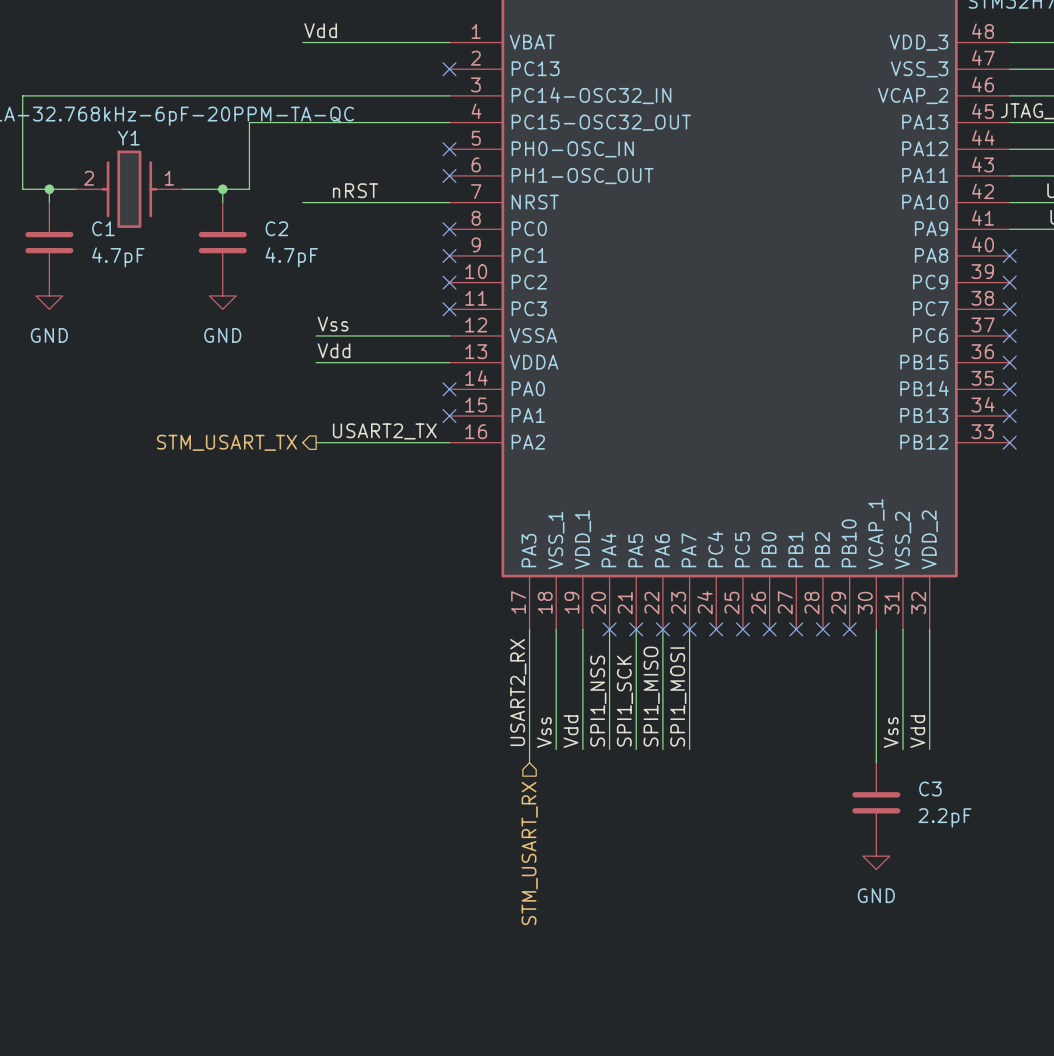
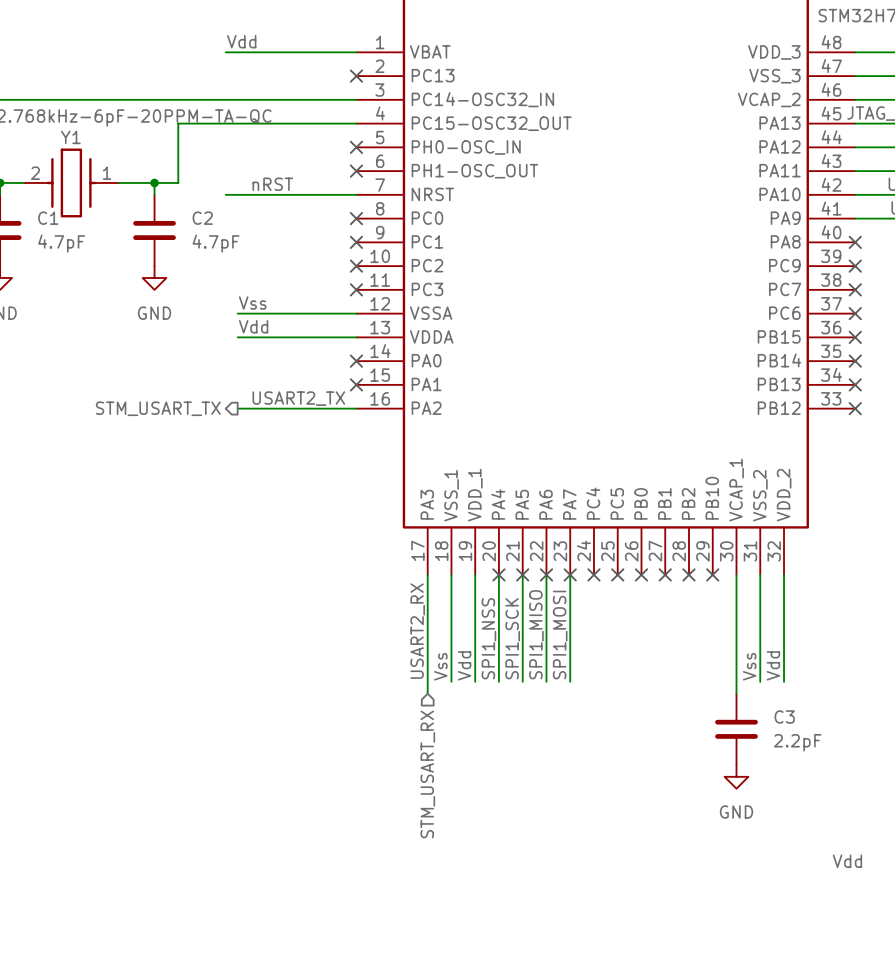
label: none -> Vdd (847, 861)

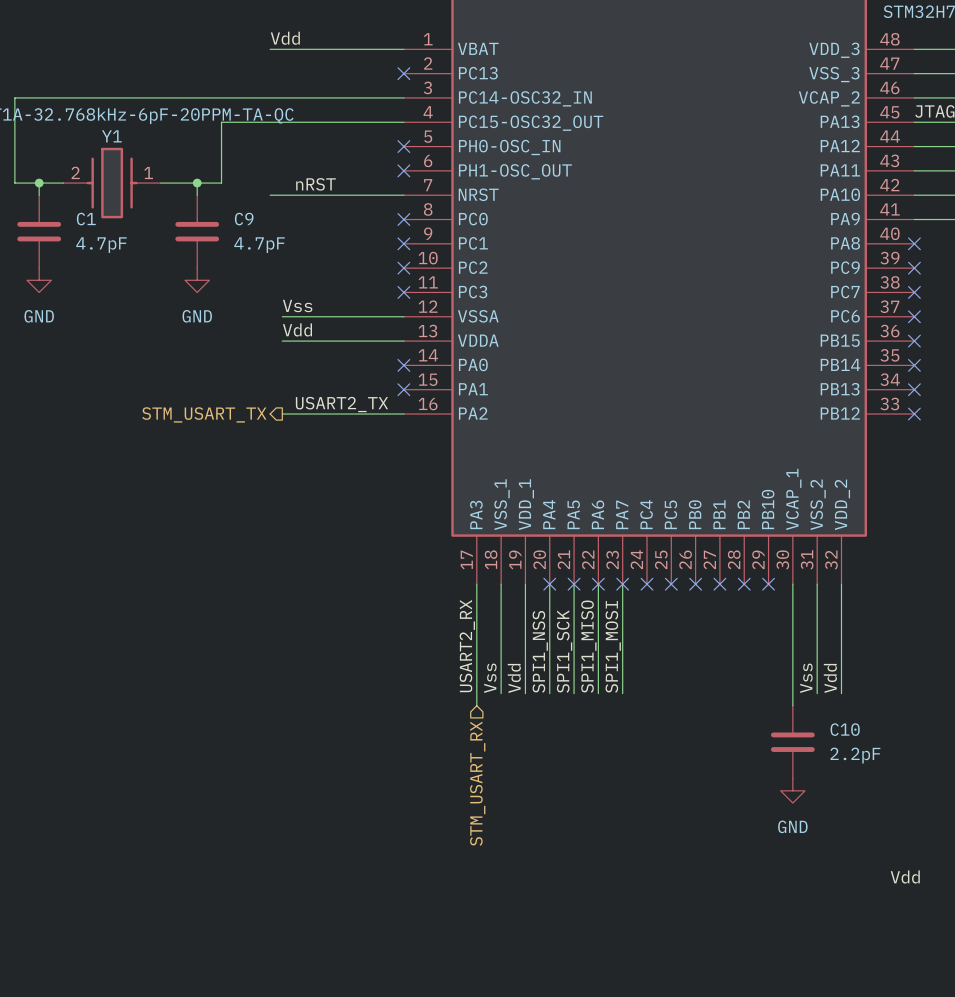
C2 name: C2 (202, 218) -> C9 (244, 219)
C3 name: C3 (784, 716) -> C10 (845, 729)

